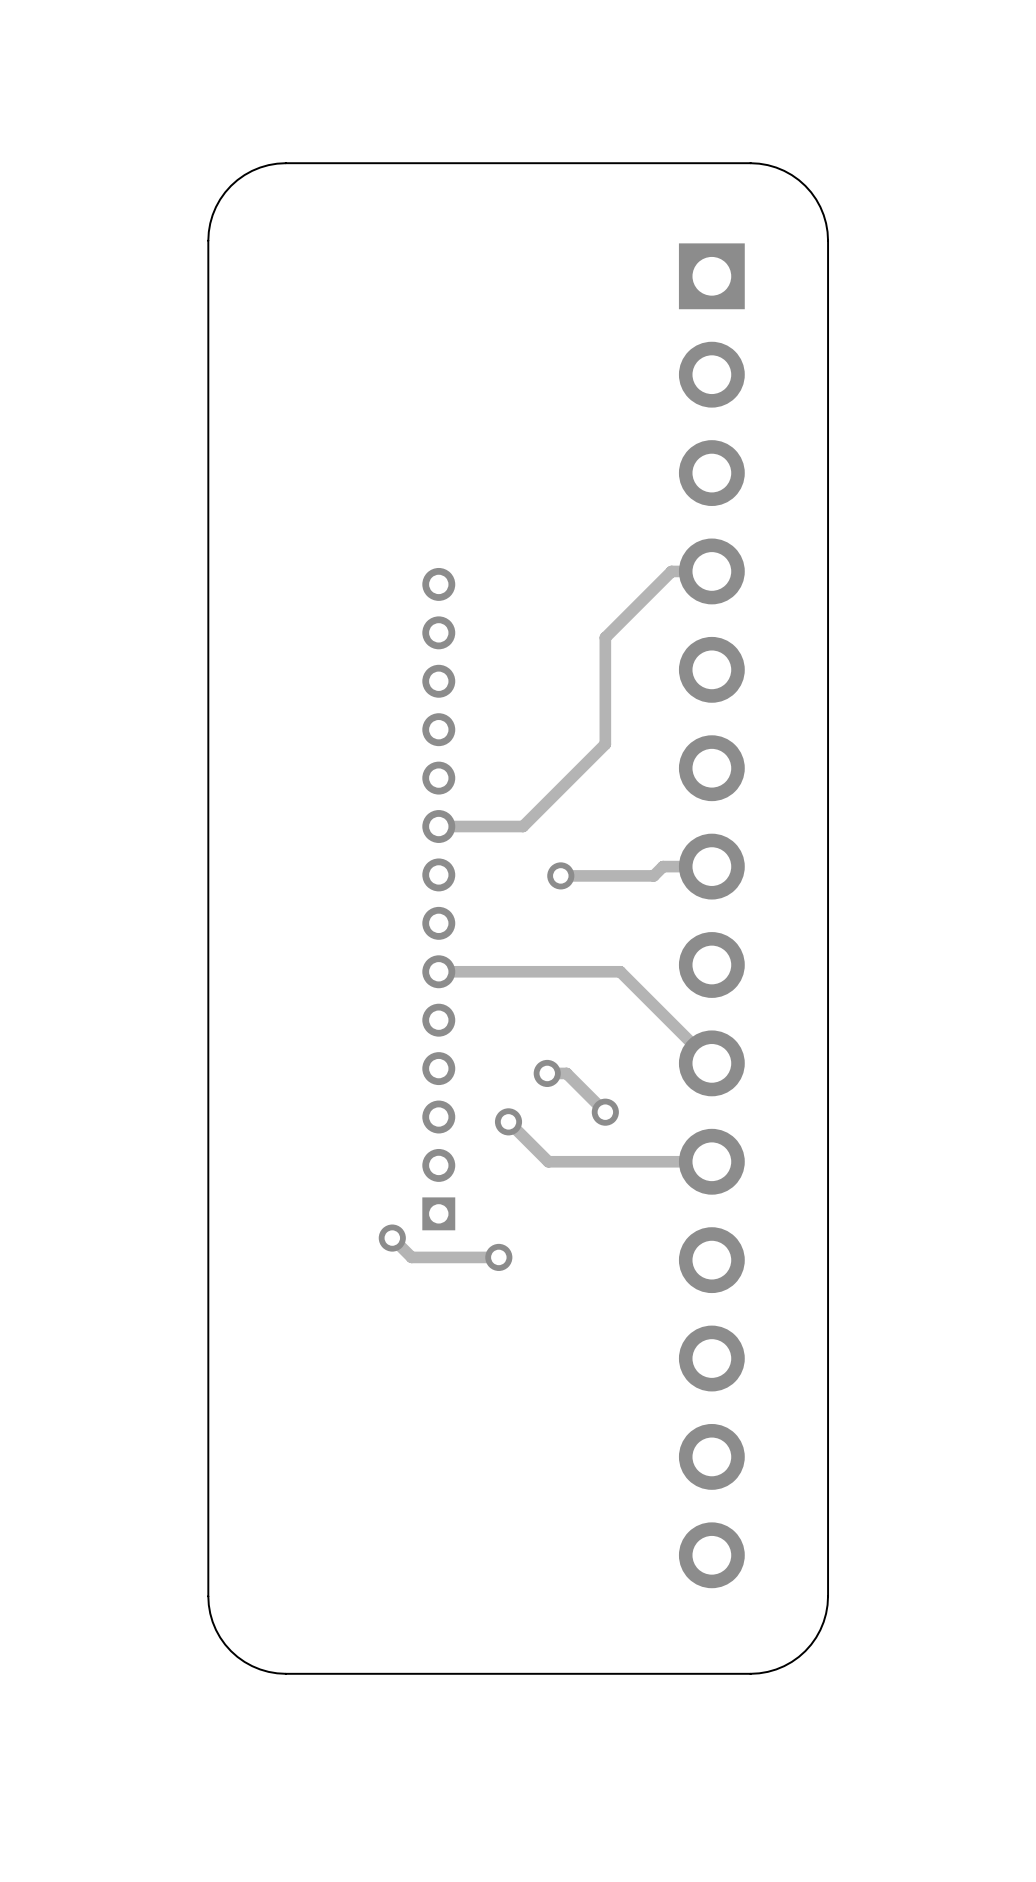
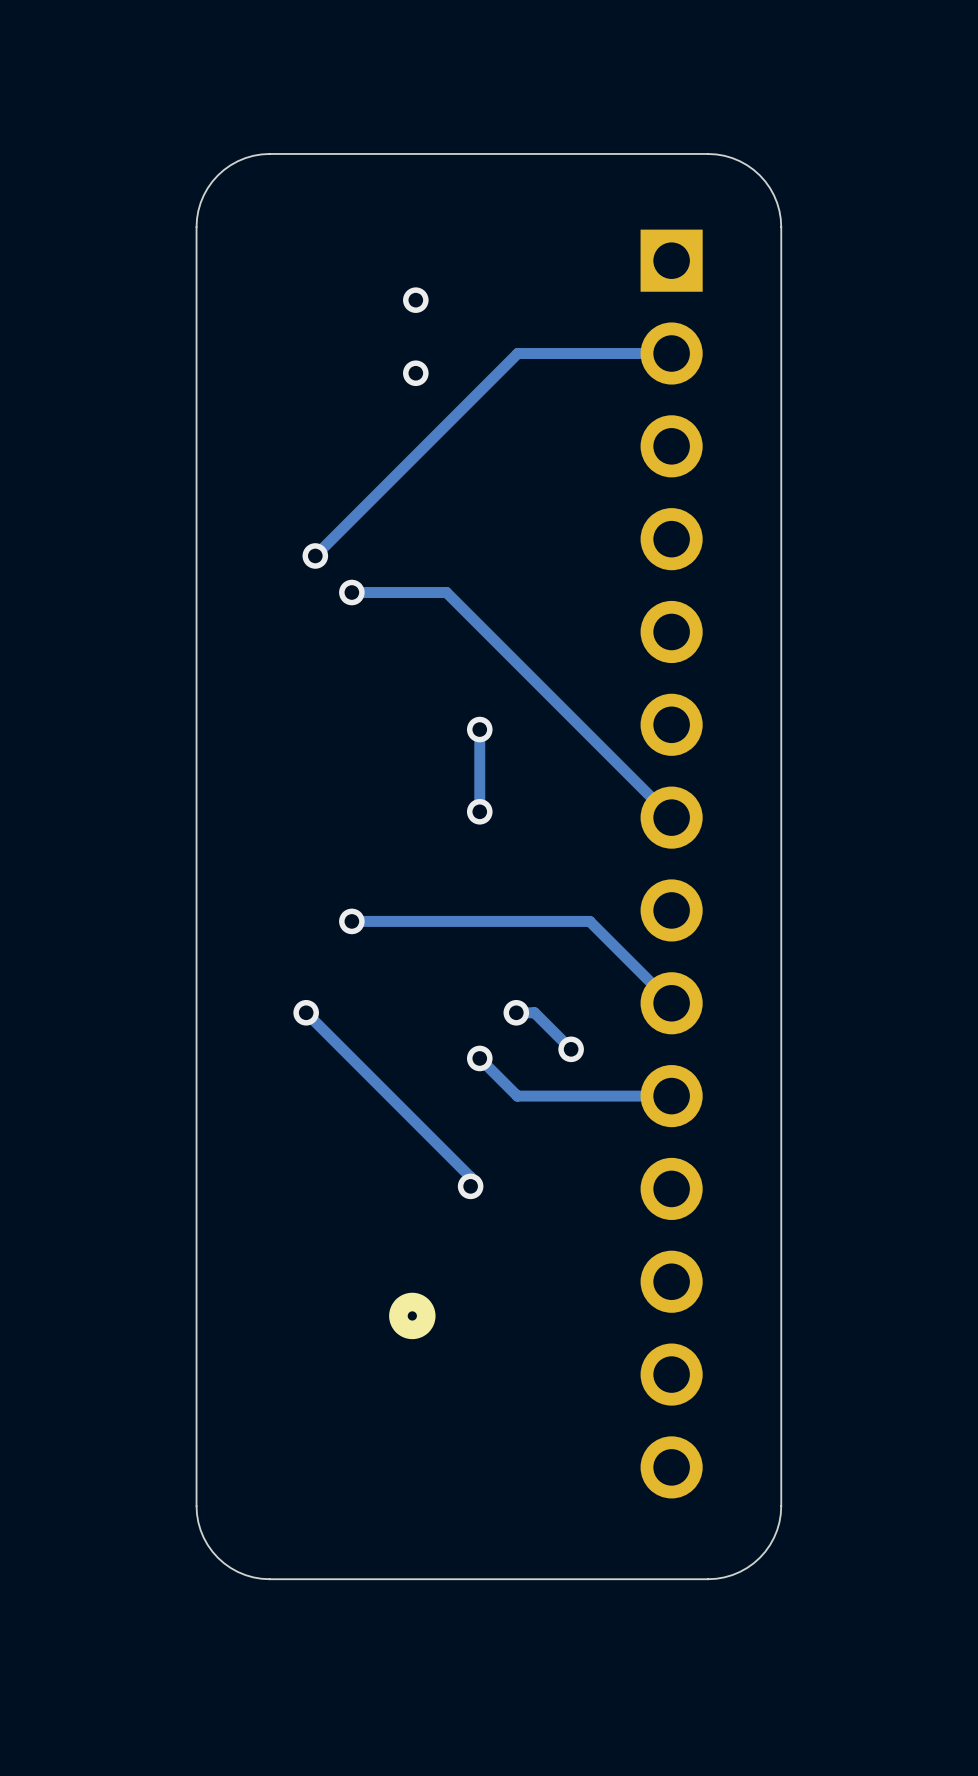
via: none -> (415, 300)
track: none -> (671, 353) (517, 353) (315, 555)
via: none -> (415, 373)
track: (711, 571) (671, 571) (605, 637) (605, 744) (523, 826) (438, 826) -> none
via: none -> (315, 555)
via: none -> (351, 592)
track: none -> (479, 729) (479, 811)
via: none -> (479, 729)
track: (711, 866) (663, 866) (653, 875) (560, 875) -> (671, 817) (446, 592) (351, 592)
via position: (560, 875) -> (479, 811)
part: (438, 899) -> none
track: (438, 971) (620, 971) (625, 976) -> (351, 921) (589, 921)
via: none -> (351, 921)
via: none -> (306, 1012)
track: (392, 1238) (411, 1257) (498, 1257) -> (306, 1012) (470, 1177) (470, 1186)
via: (392, 1238) -> none
part: none -> (412, 1315)

